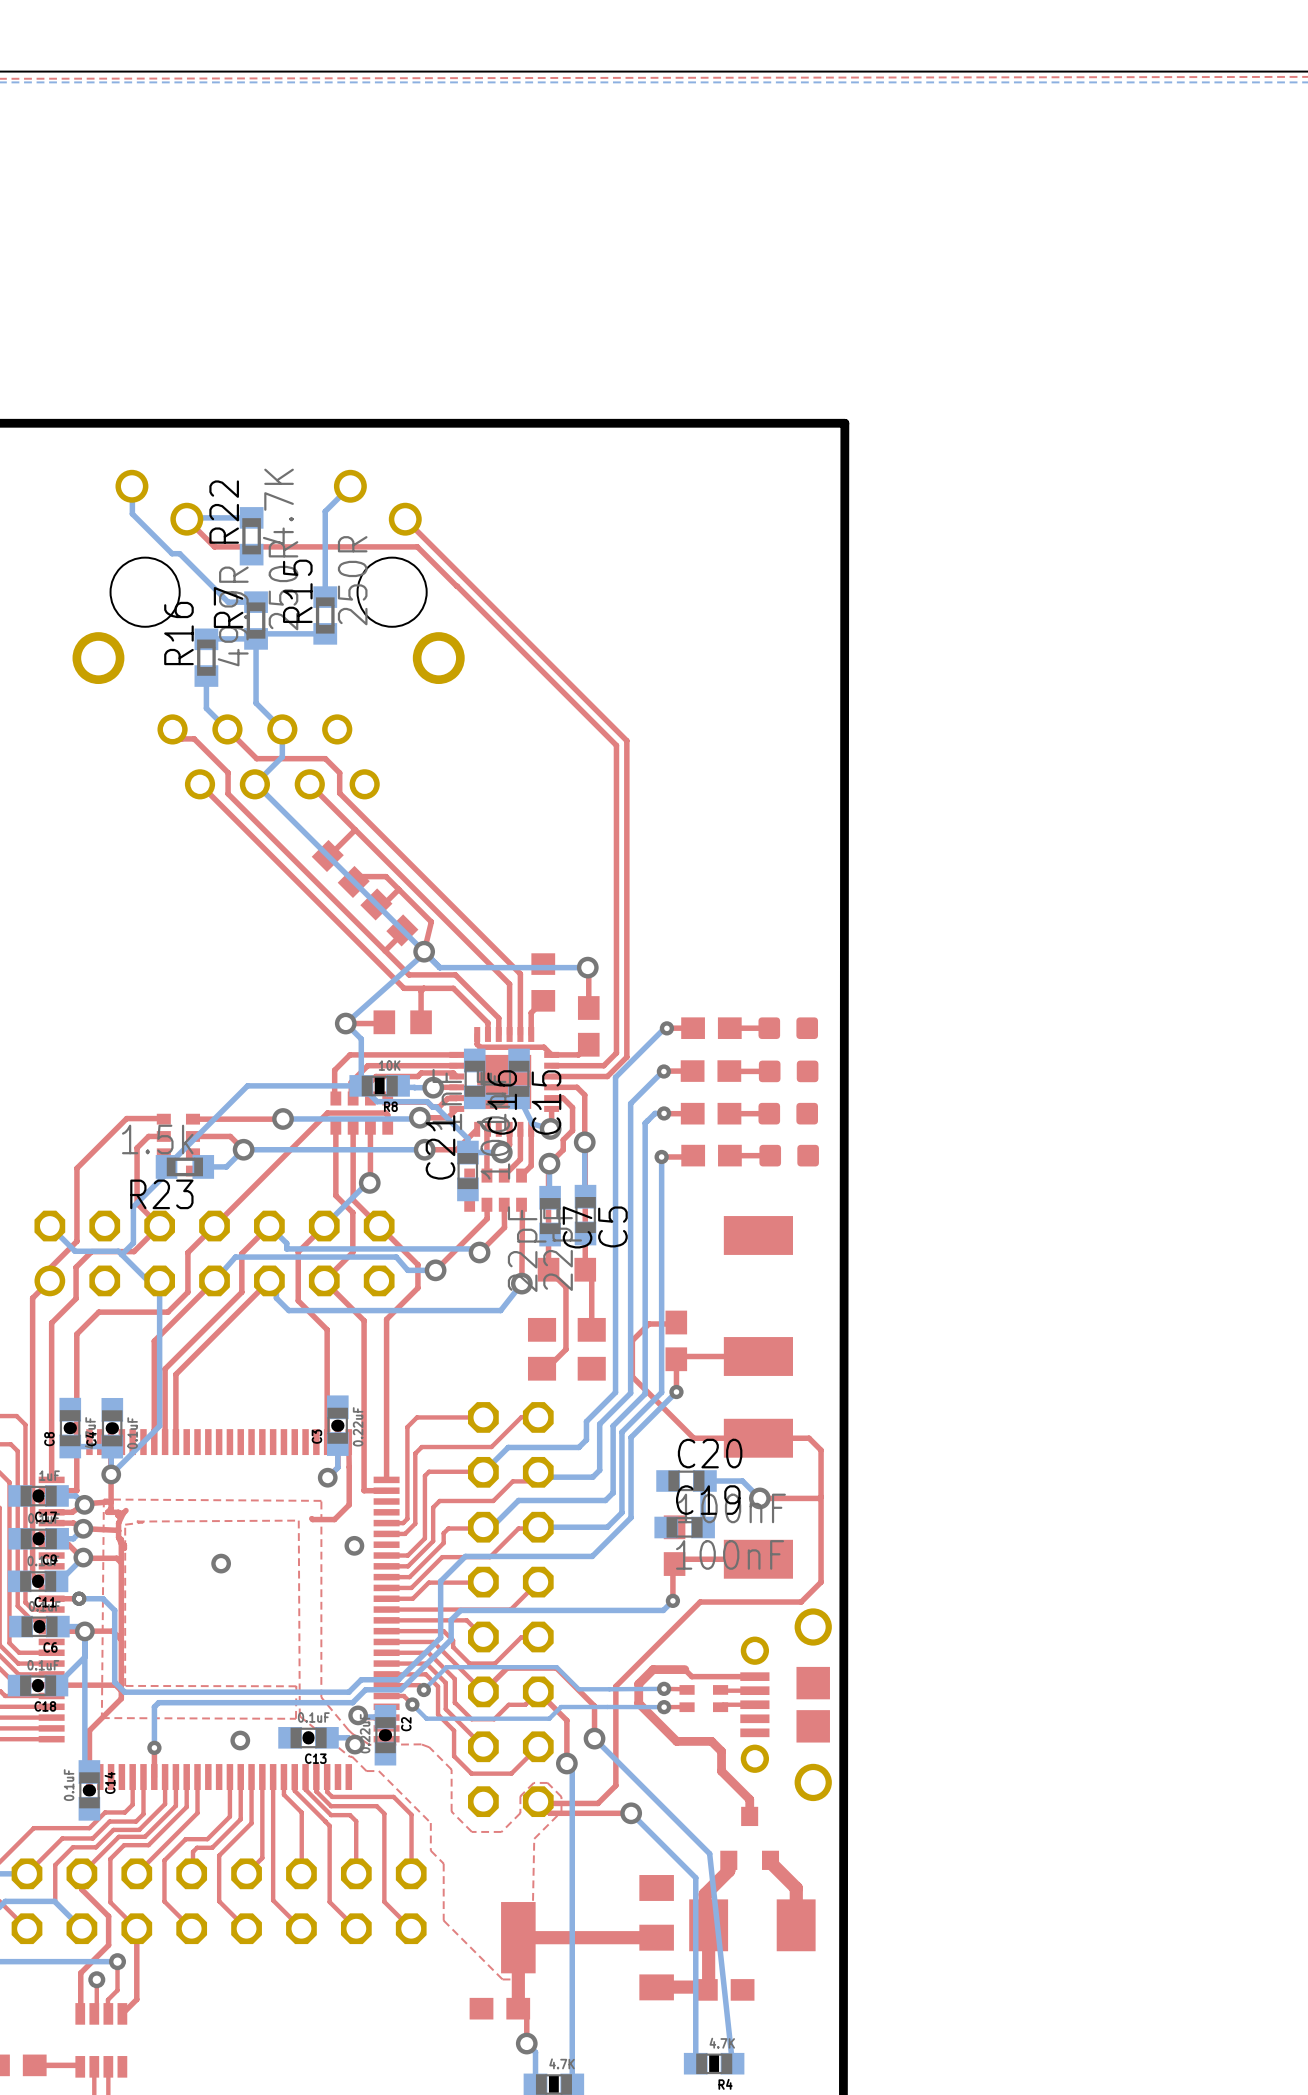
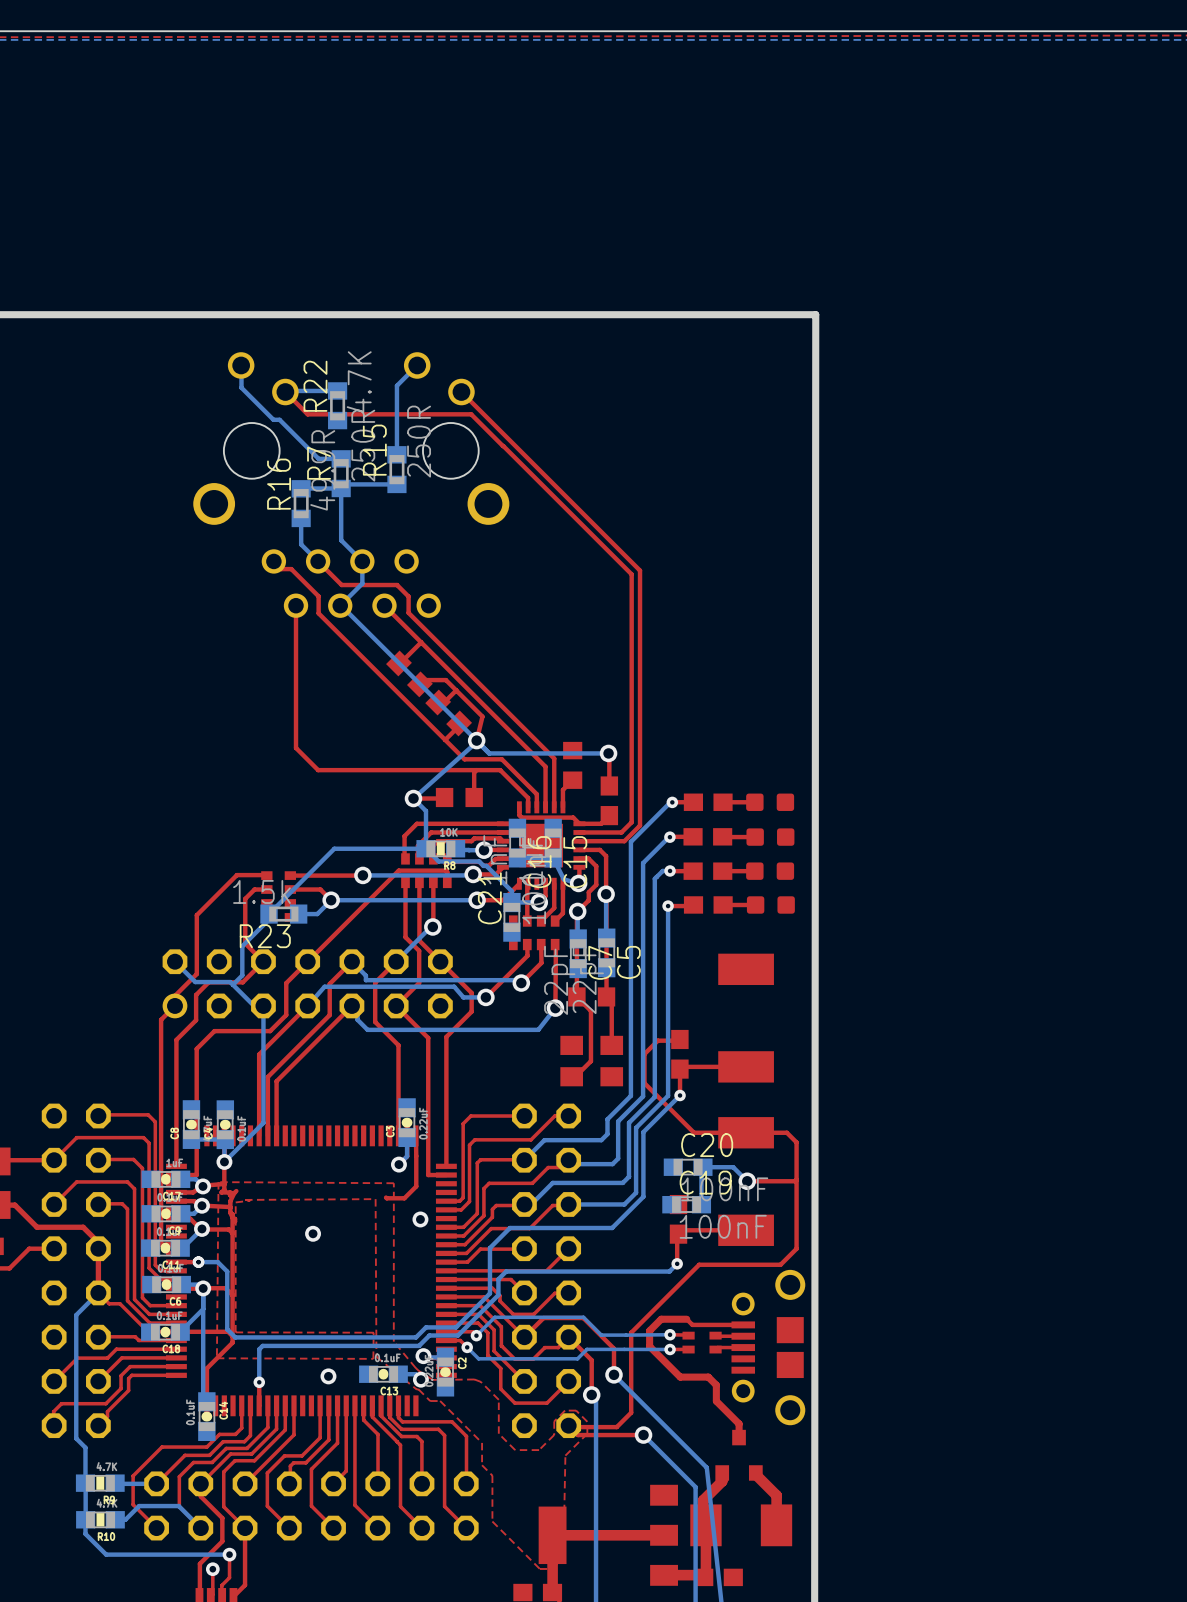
top track: (200, 784) (404, 988) -> (296, 605) (296, 748) (318, 770) (460, 770)

